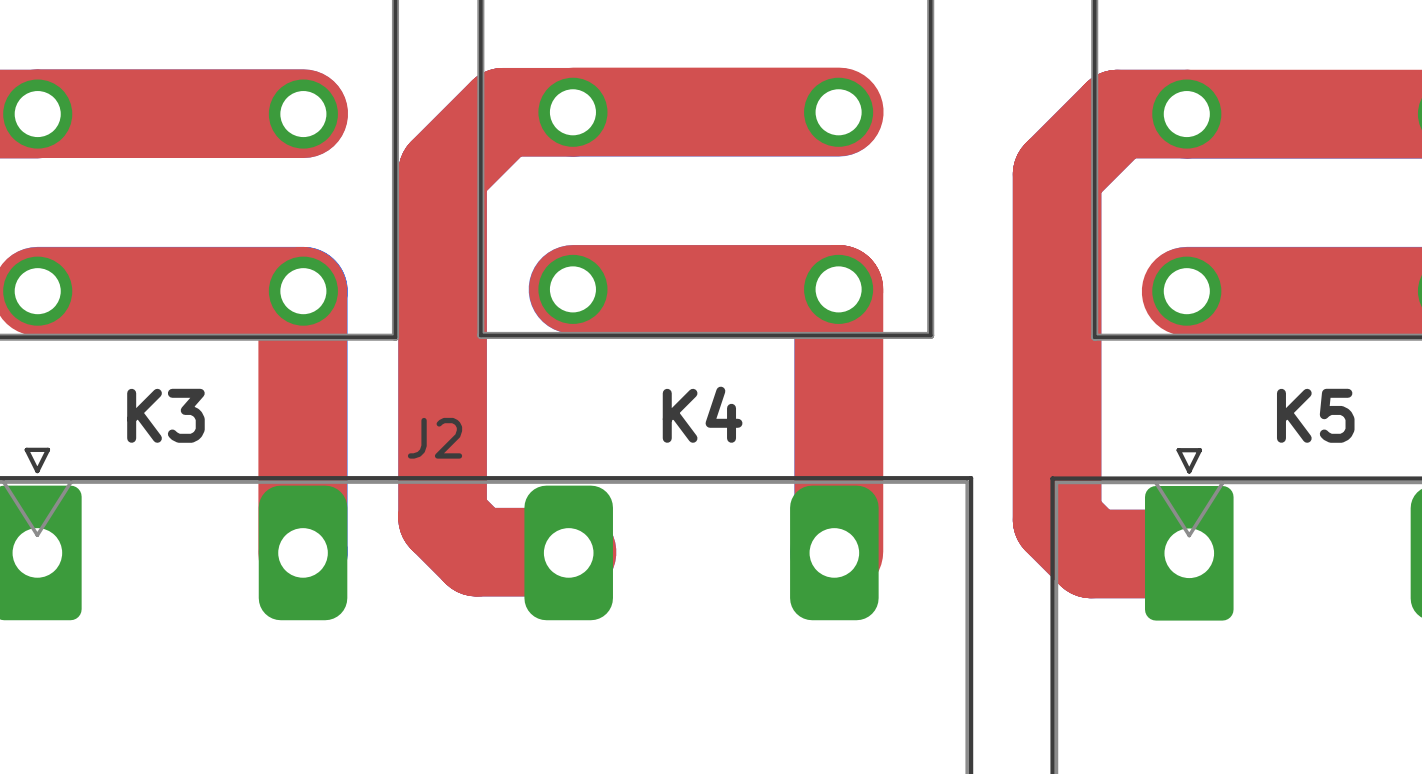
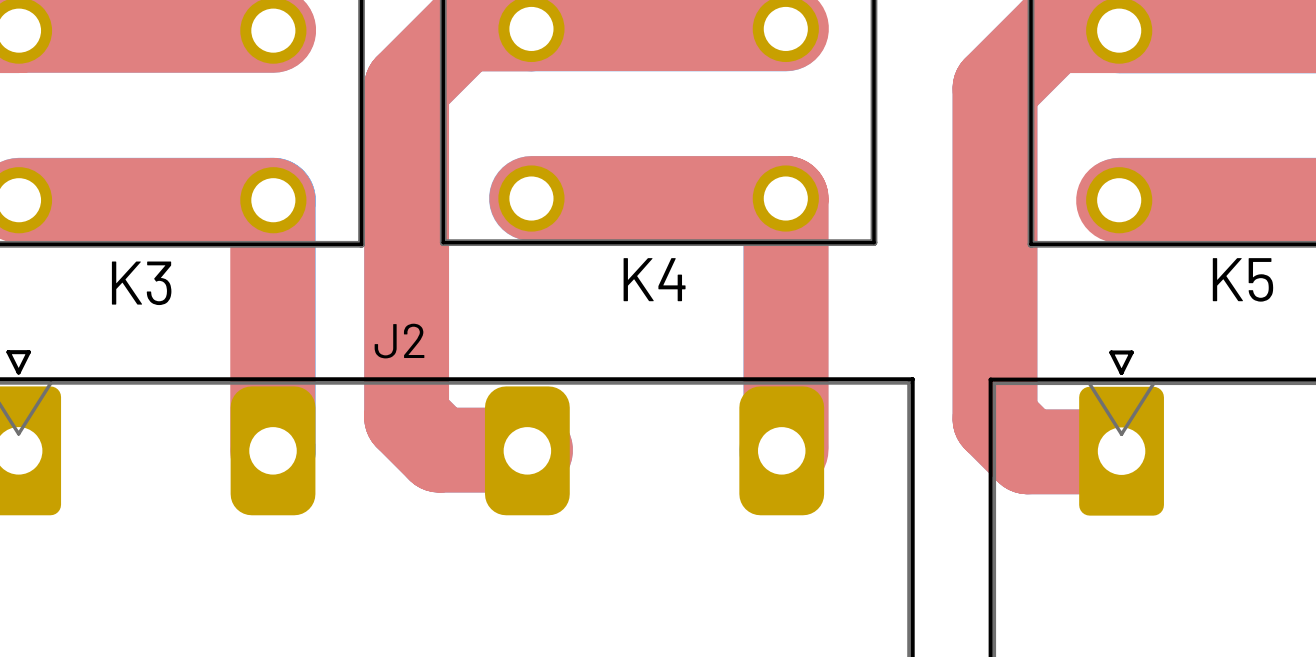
K4 name position: K4 (702, 414) -> K4 (654, 279)
K3 name position: K3 (165, 415) -> K3 (141, 283)
K5 name position: K5 (1315, 415) -> K5 (1242, 279)

